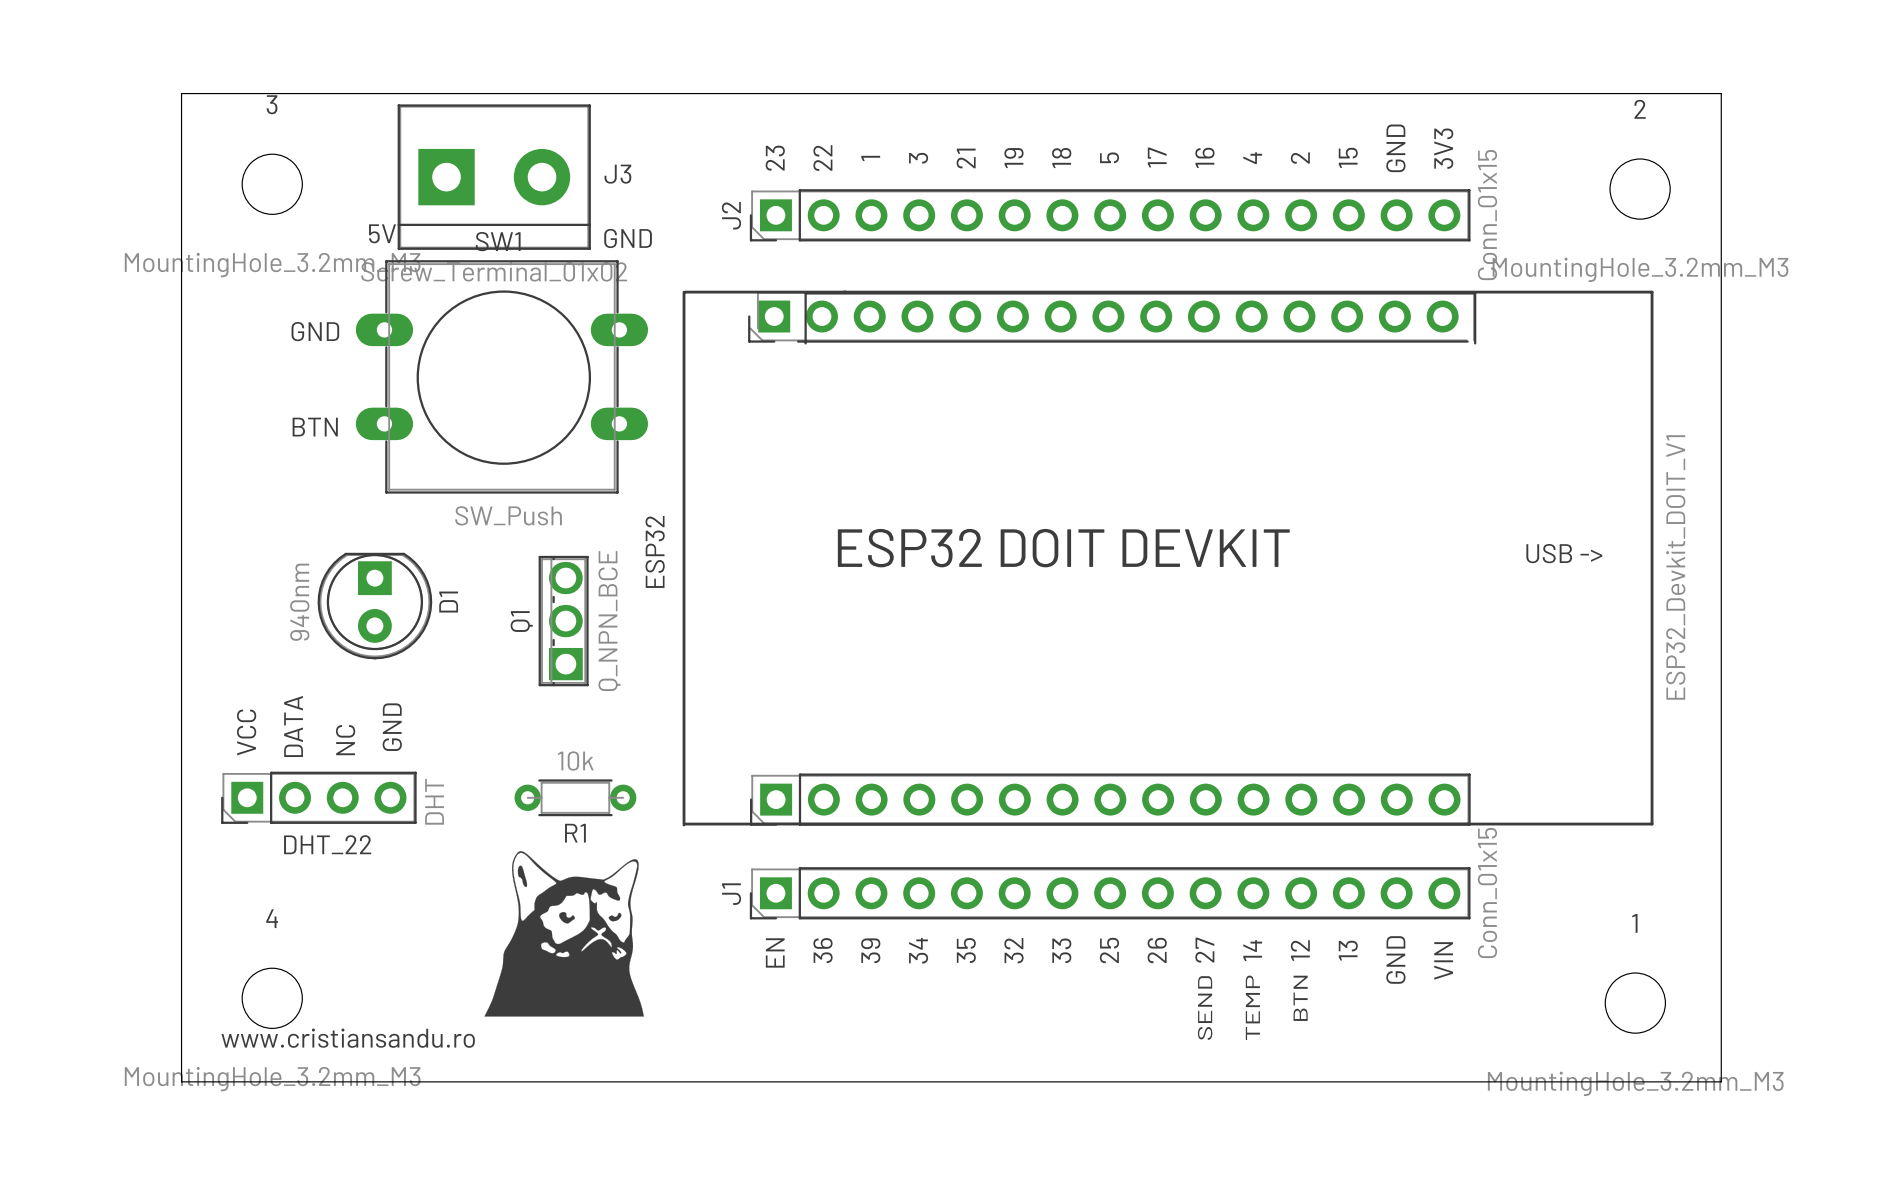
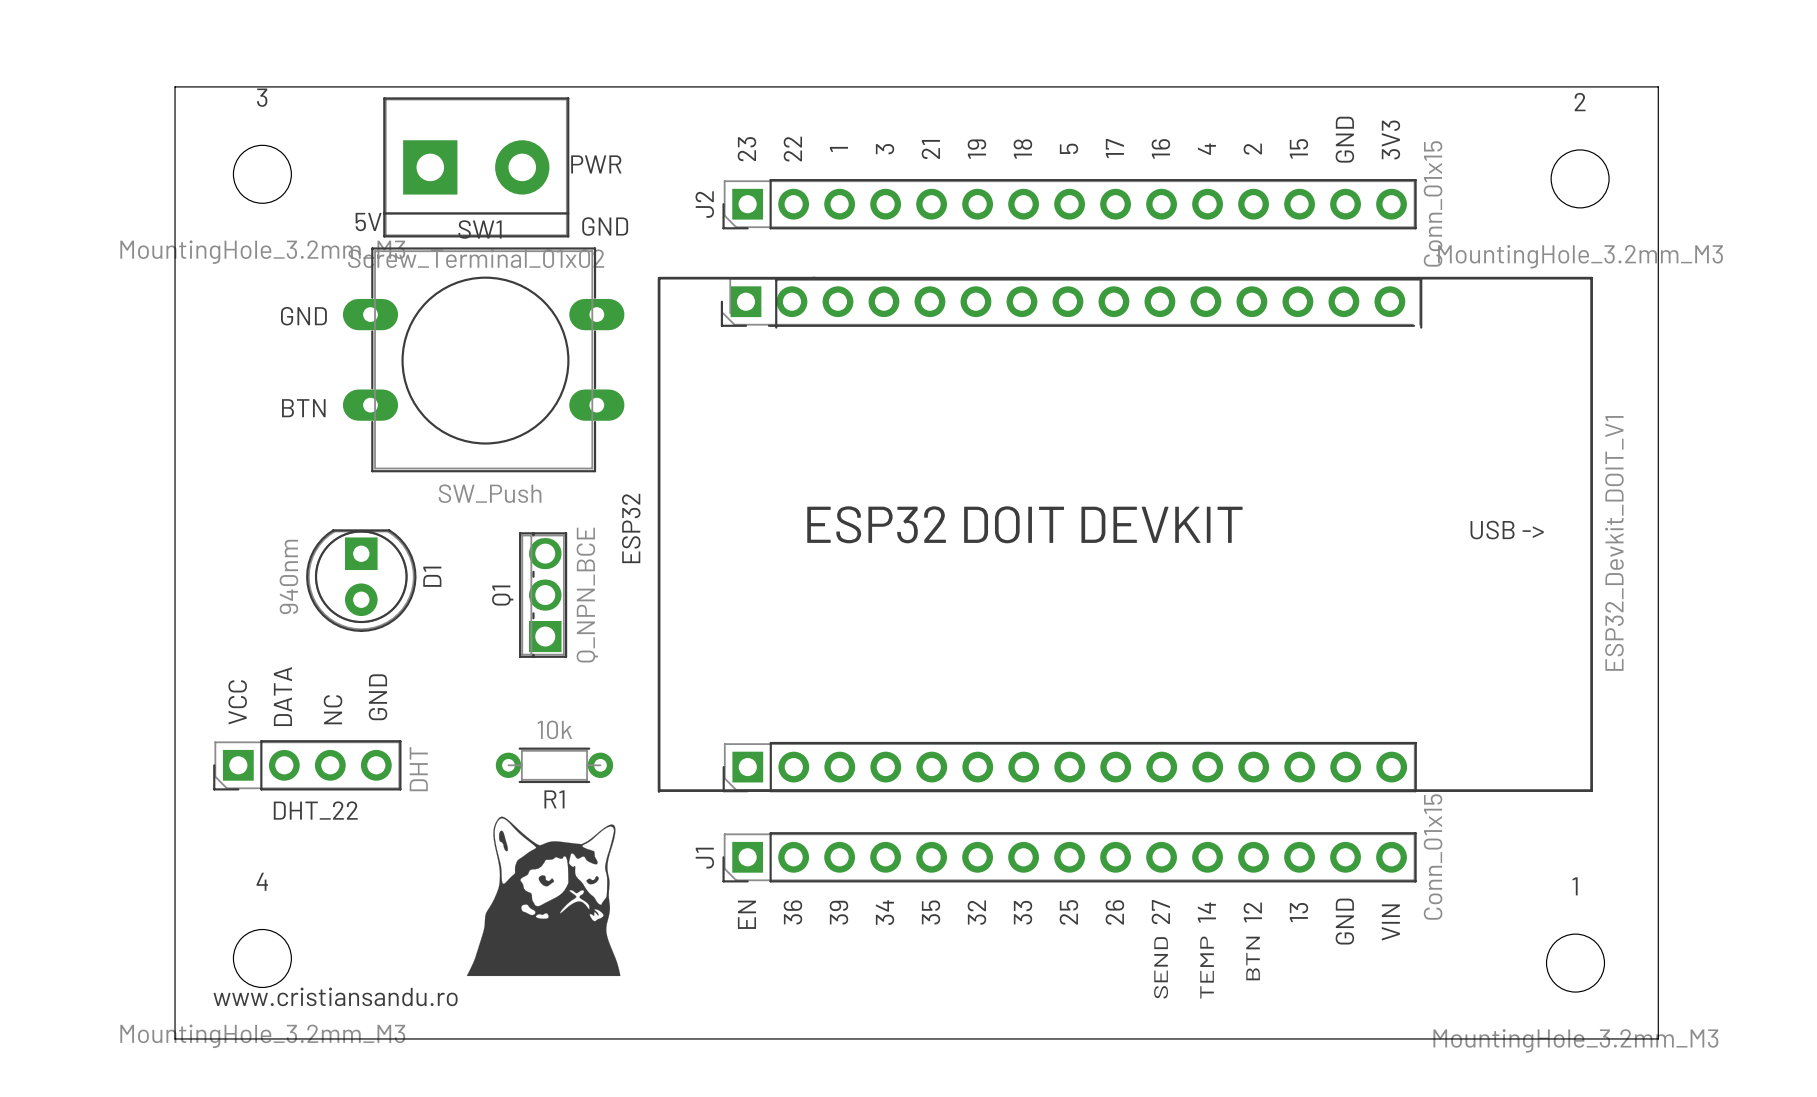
J3 name: J3 (617, 174) -> PWR (596, 164)

